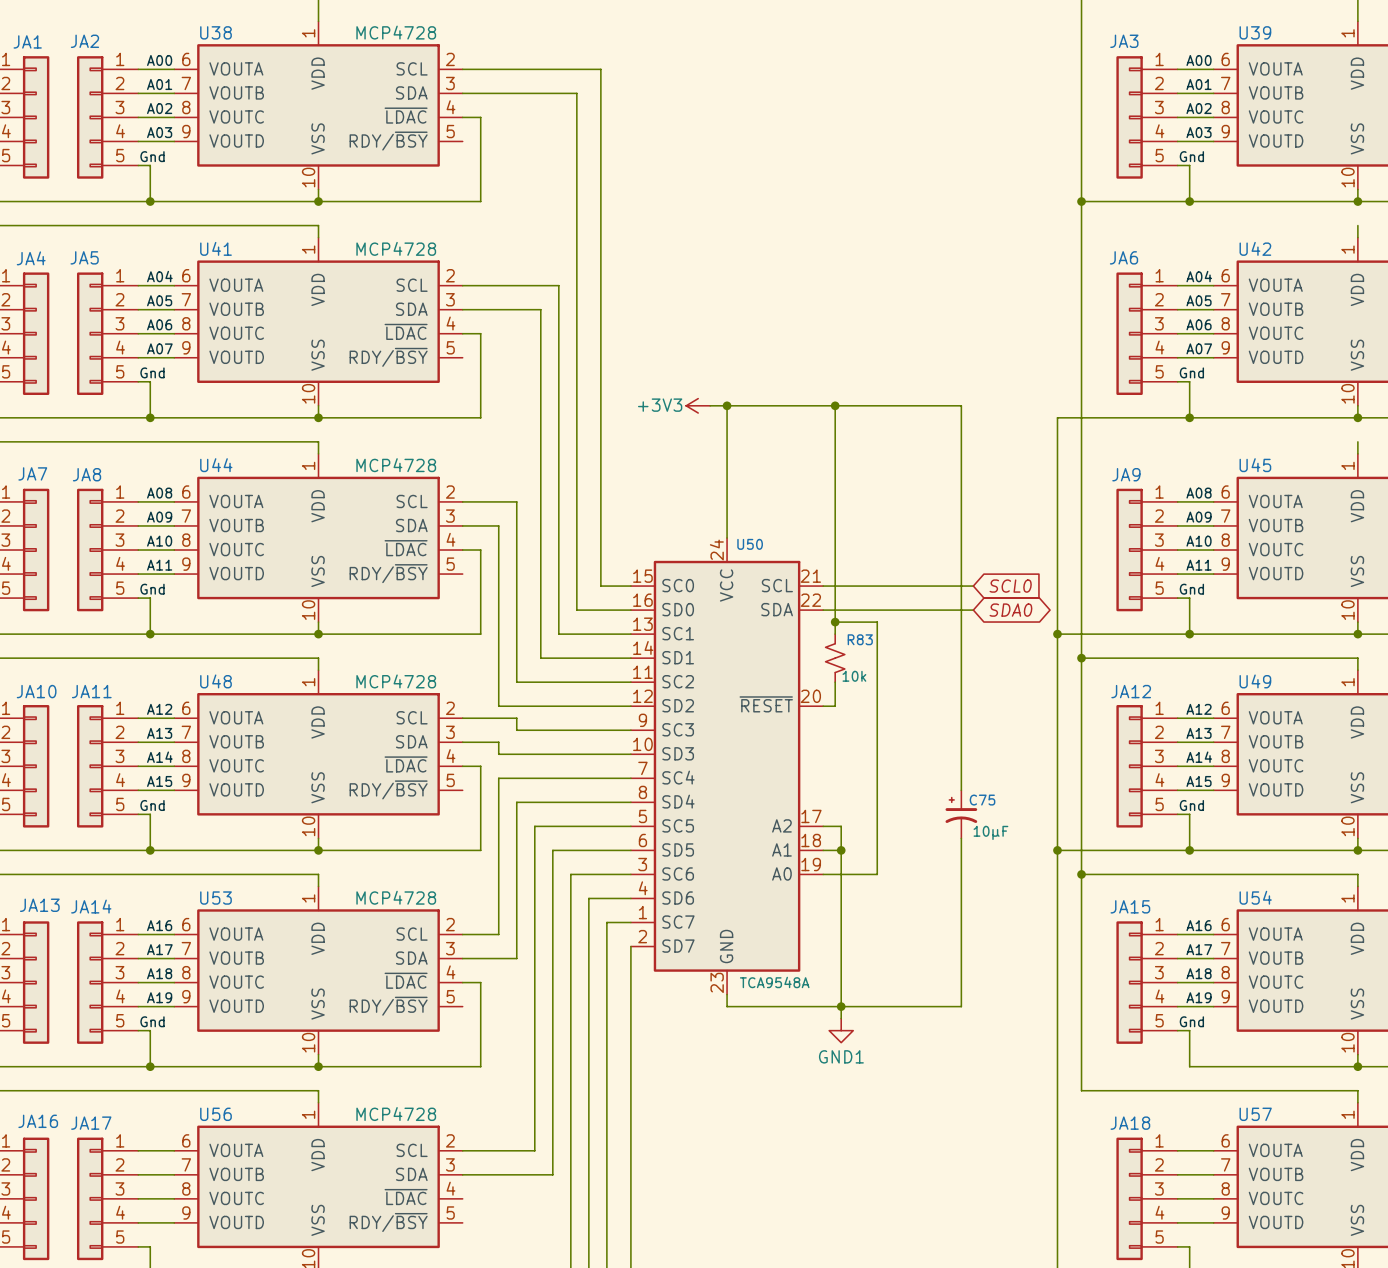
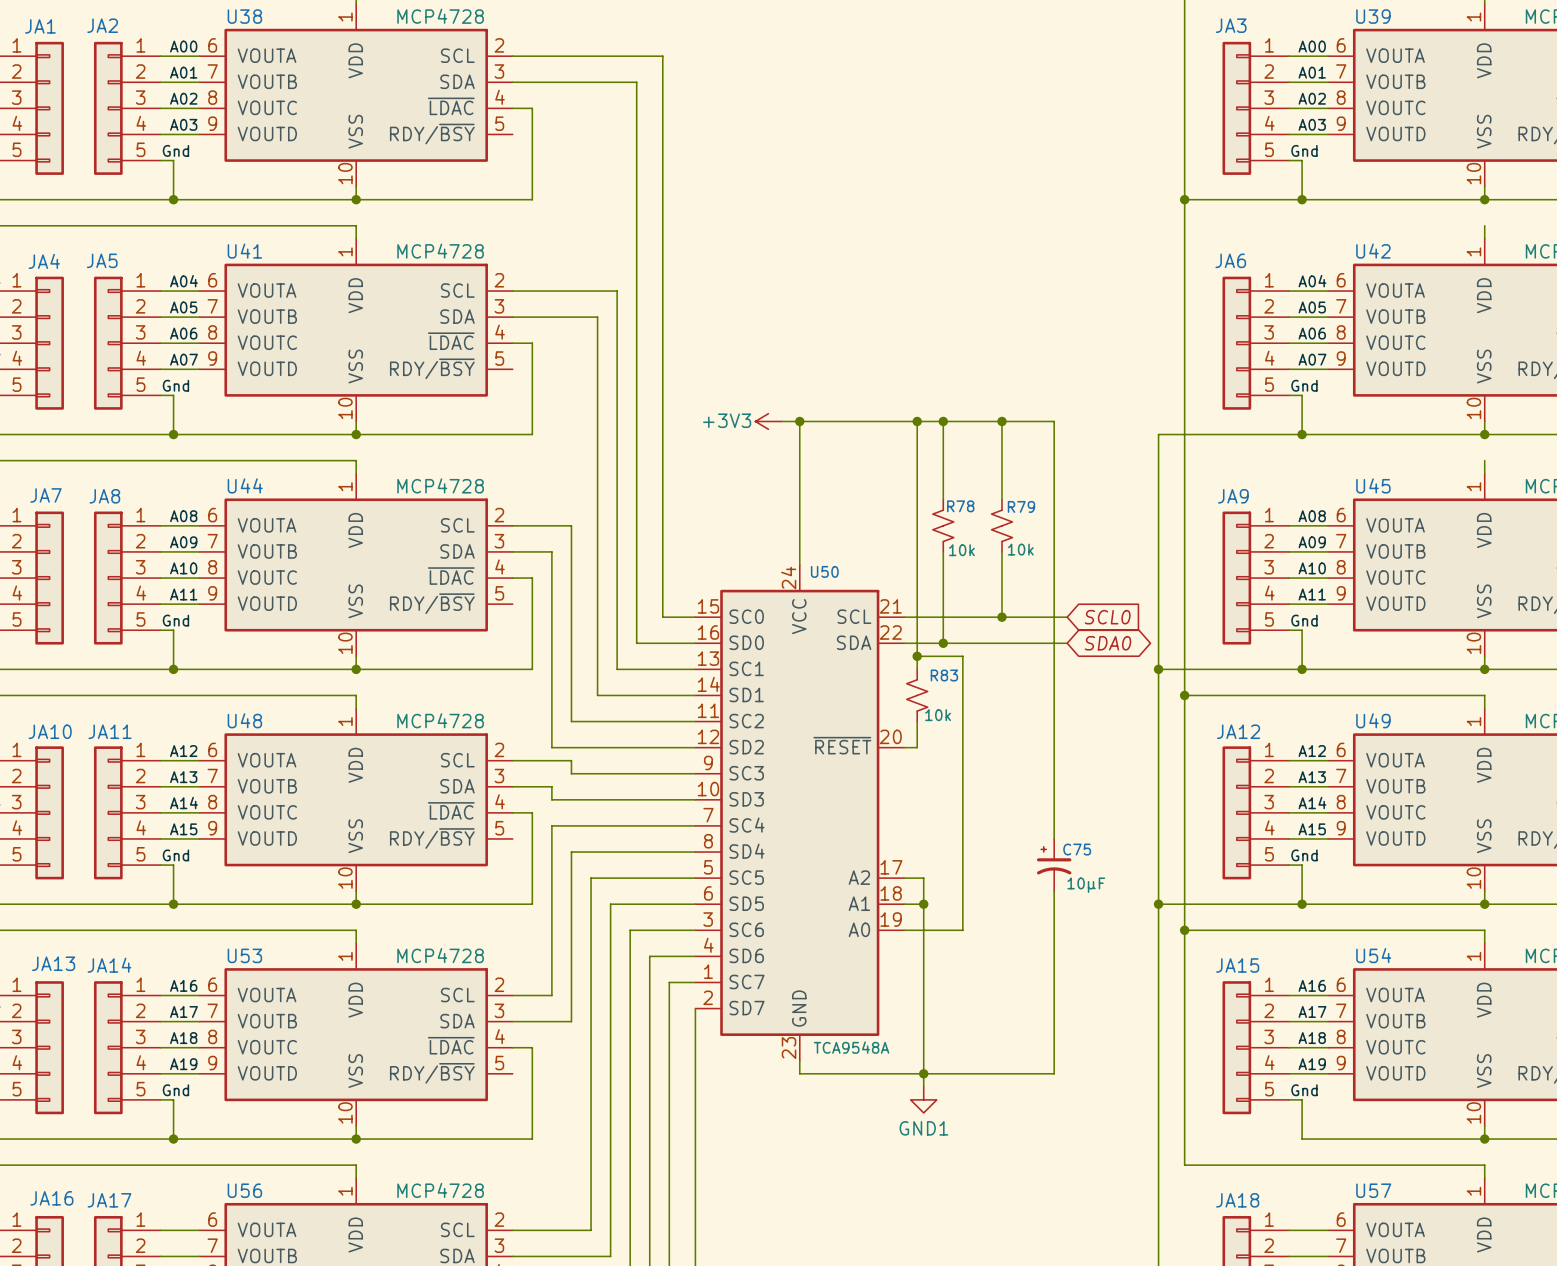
wire: none -> (943, 421) (943, 499)
junction: none -> (943, 421)
wire: none -> (1002, 421) (1002, 499)
junction: none -> (1002, 421)
R78: none -> 10k (943, 525)
R79: none -> 10k (1002, 525)
wire: none -> (943, 551) (943, 643)
wire: none -> (1002, 551) (1002, 617)
junction: none -> (1002, 617)
junction: none -> (943, 643)

